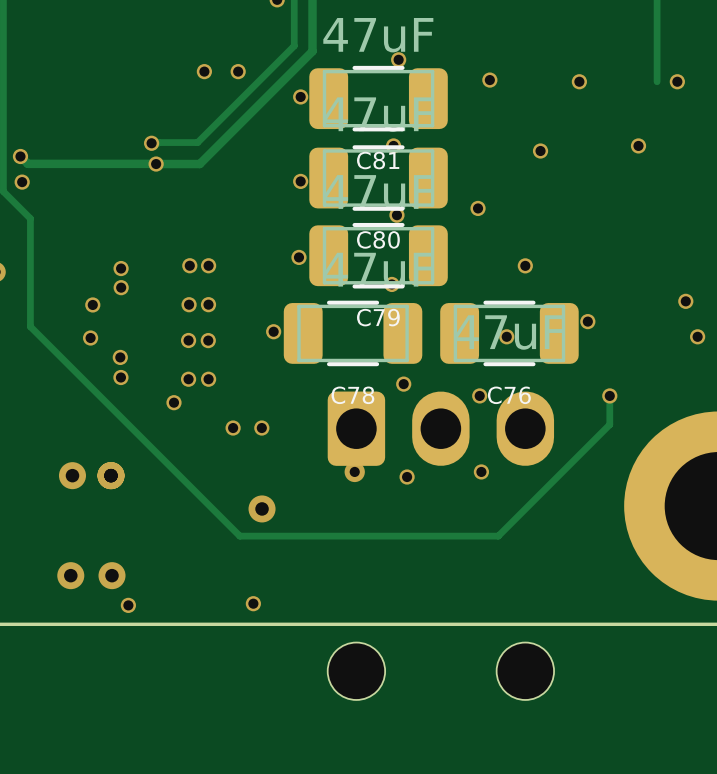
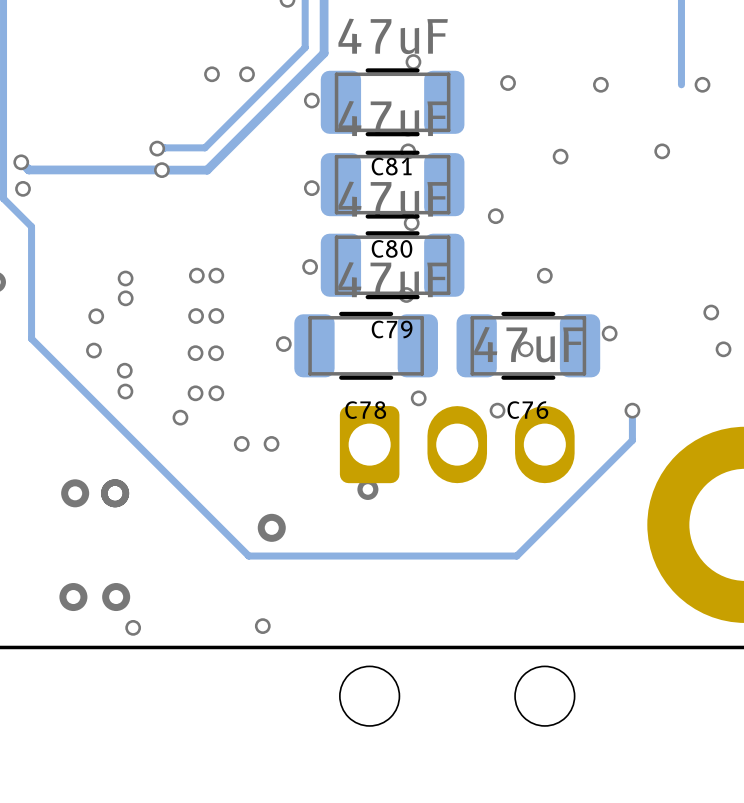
via: (481, 471) -> none
via: (407, 477) -> none

